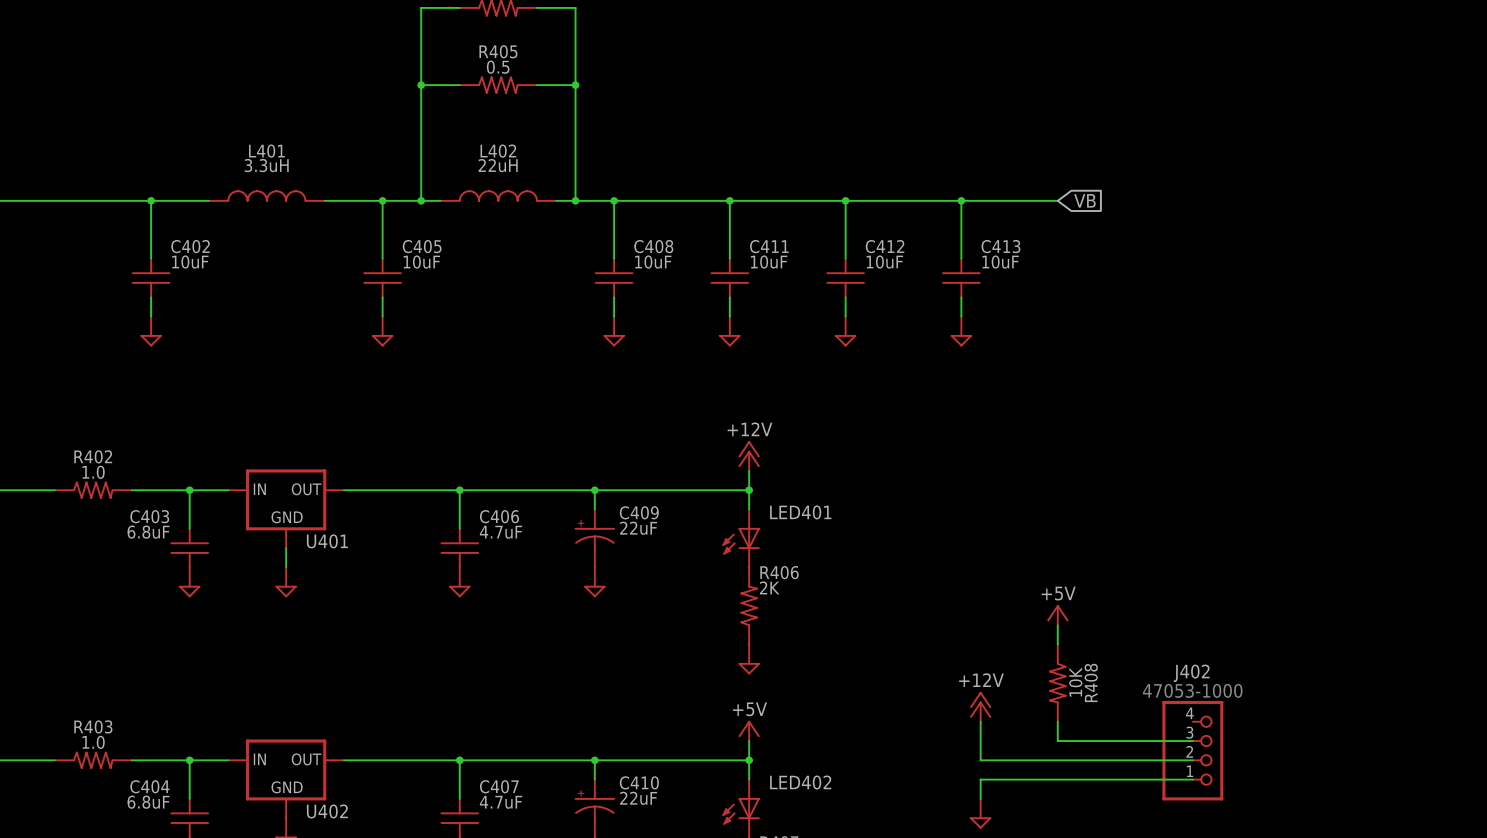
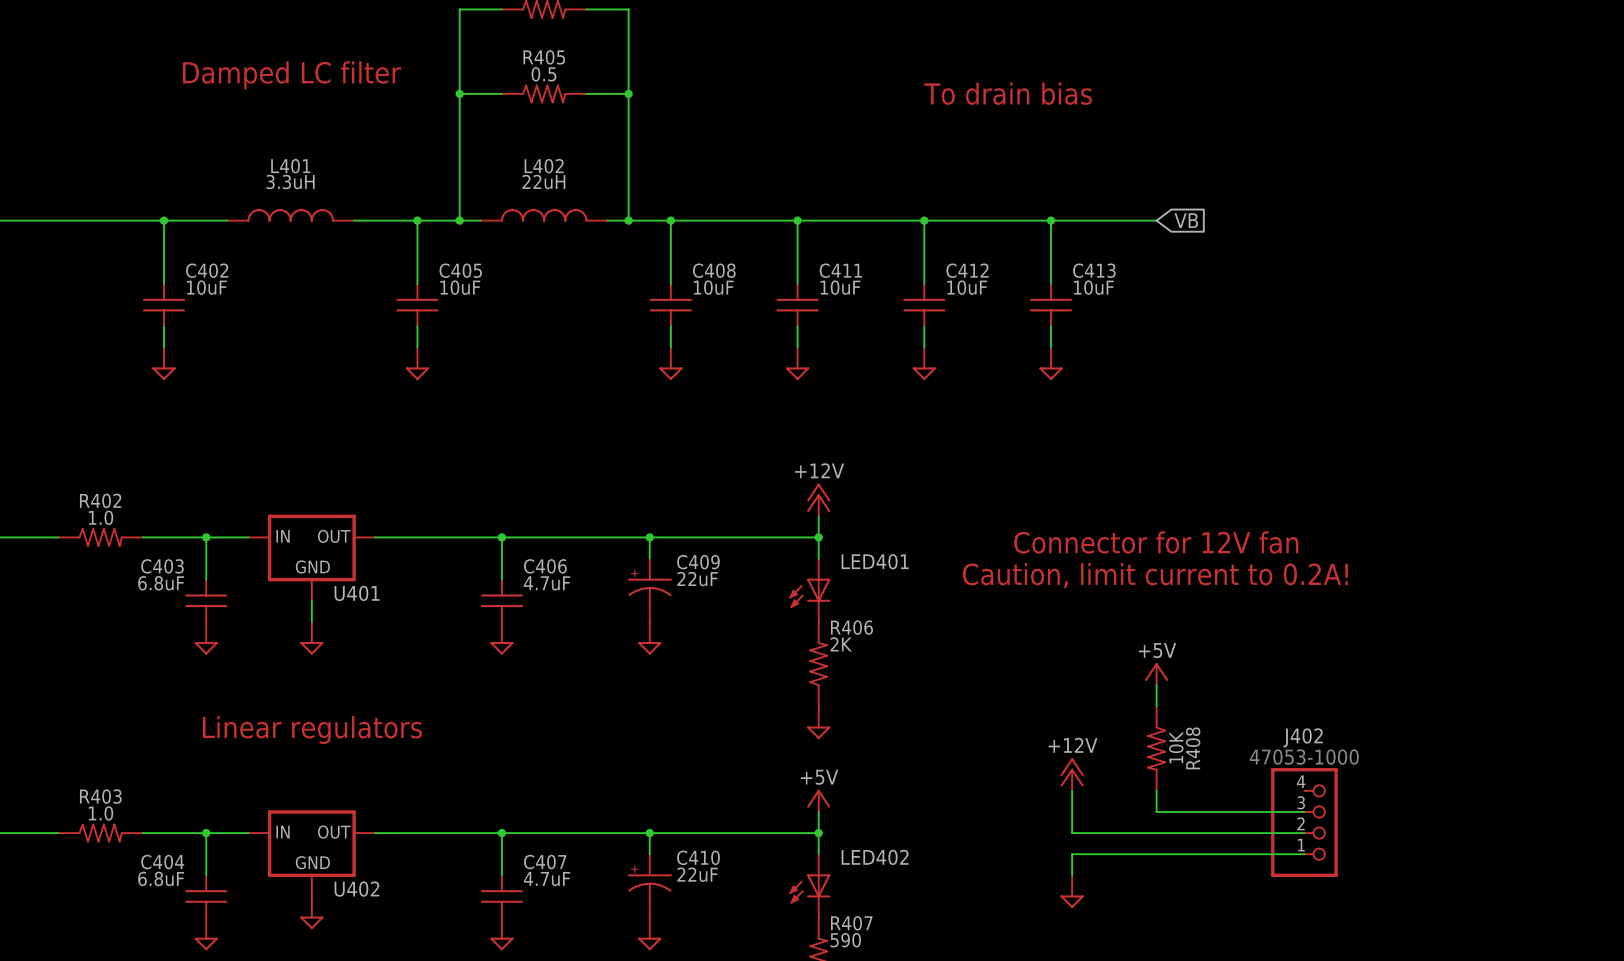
text: none -> Damped LC filter (292, 75)
text: none -> To drain bias (1008, 93)
text: none -> Connector for 12V fan (1156, 542)
text: none -> Caution, limit current to 0.2A! (1155, 575)
text: none -> Linear regulators (312, 730)

